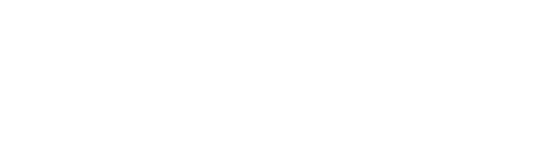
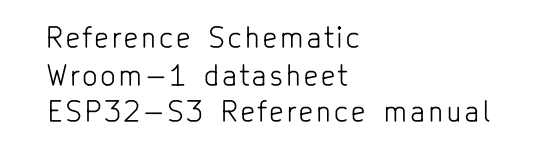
text: none -> Reference Schematic (203, 36)
text: none -> Wroom-1 datasheet (197, 74)
text: none -> ESP32-S3 Reference manual (269, 110)

